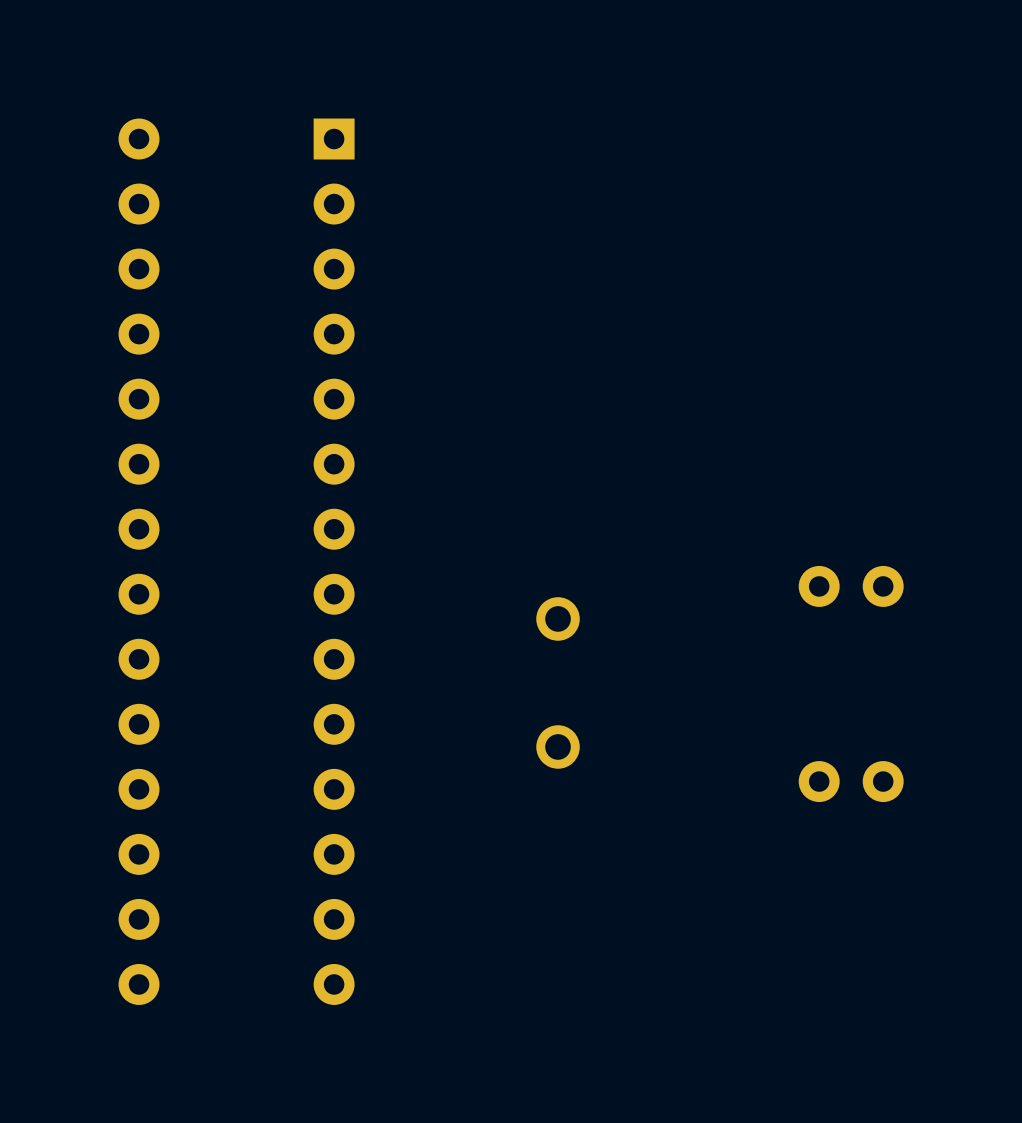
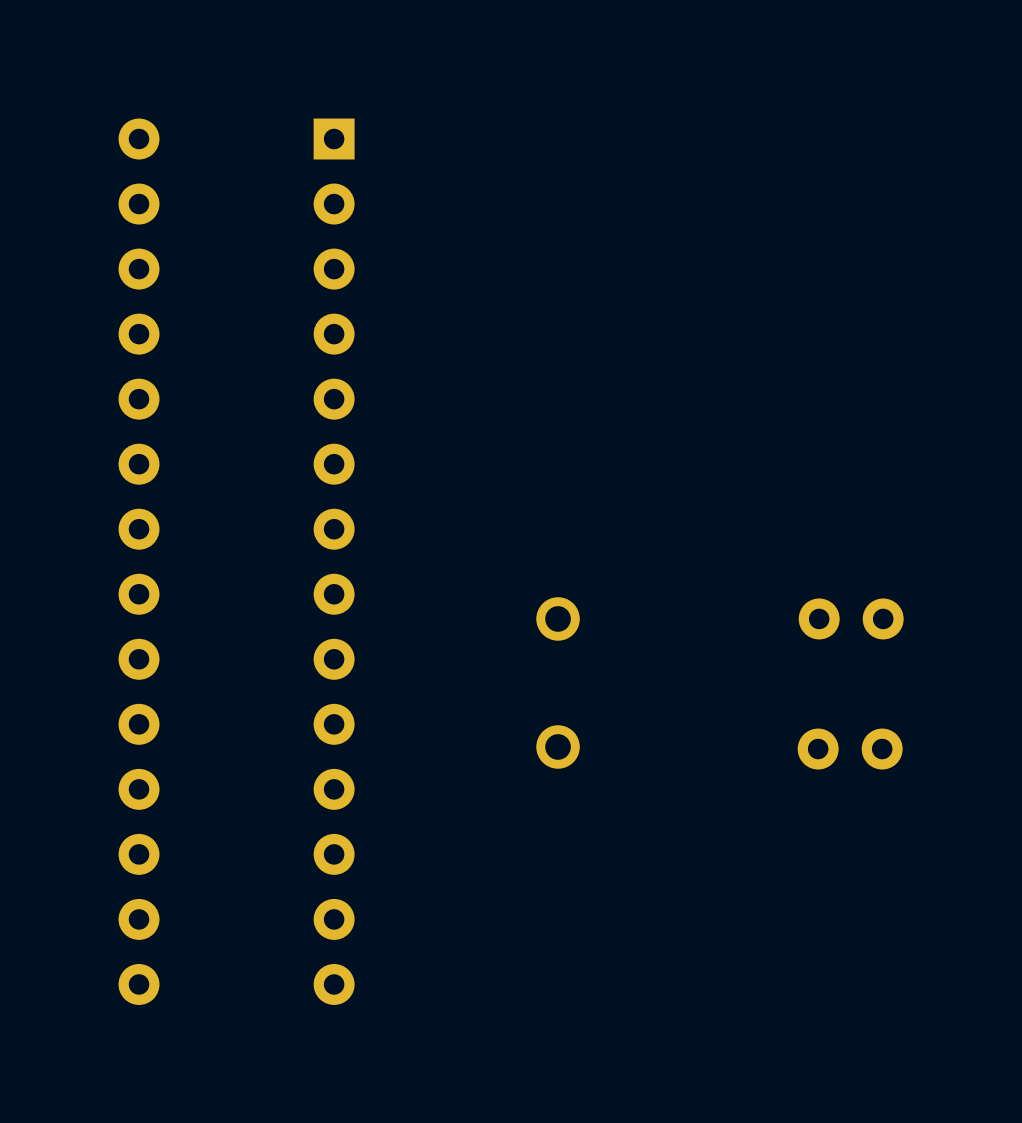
part position: (851, 586) -> (851, 618)
part position: (851, 781) -> (850, 749)

